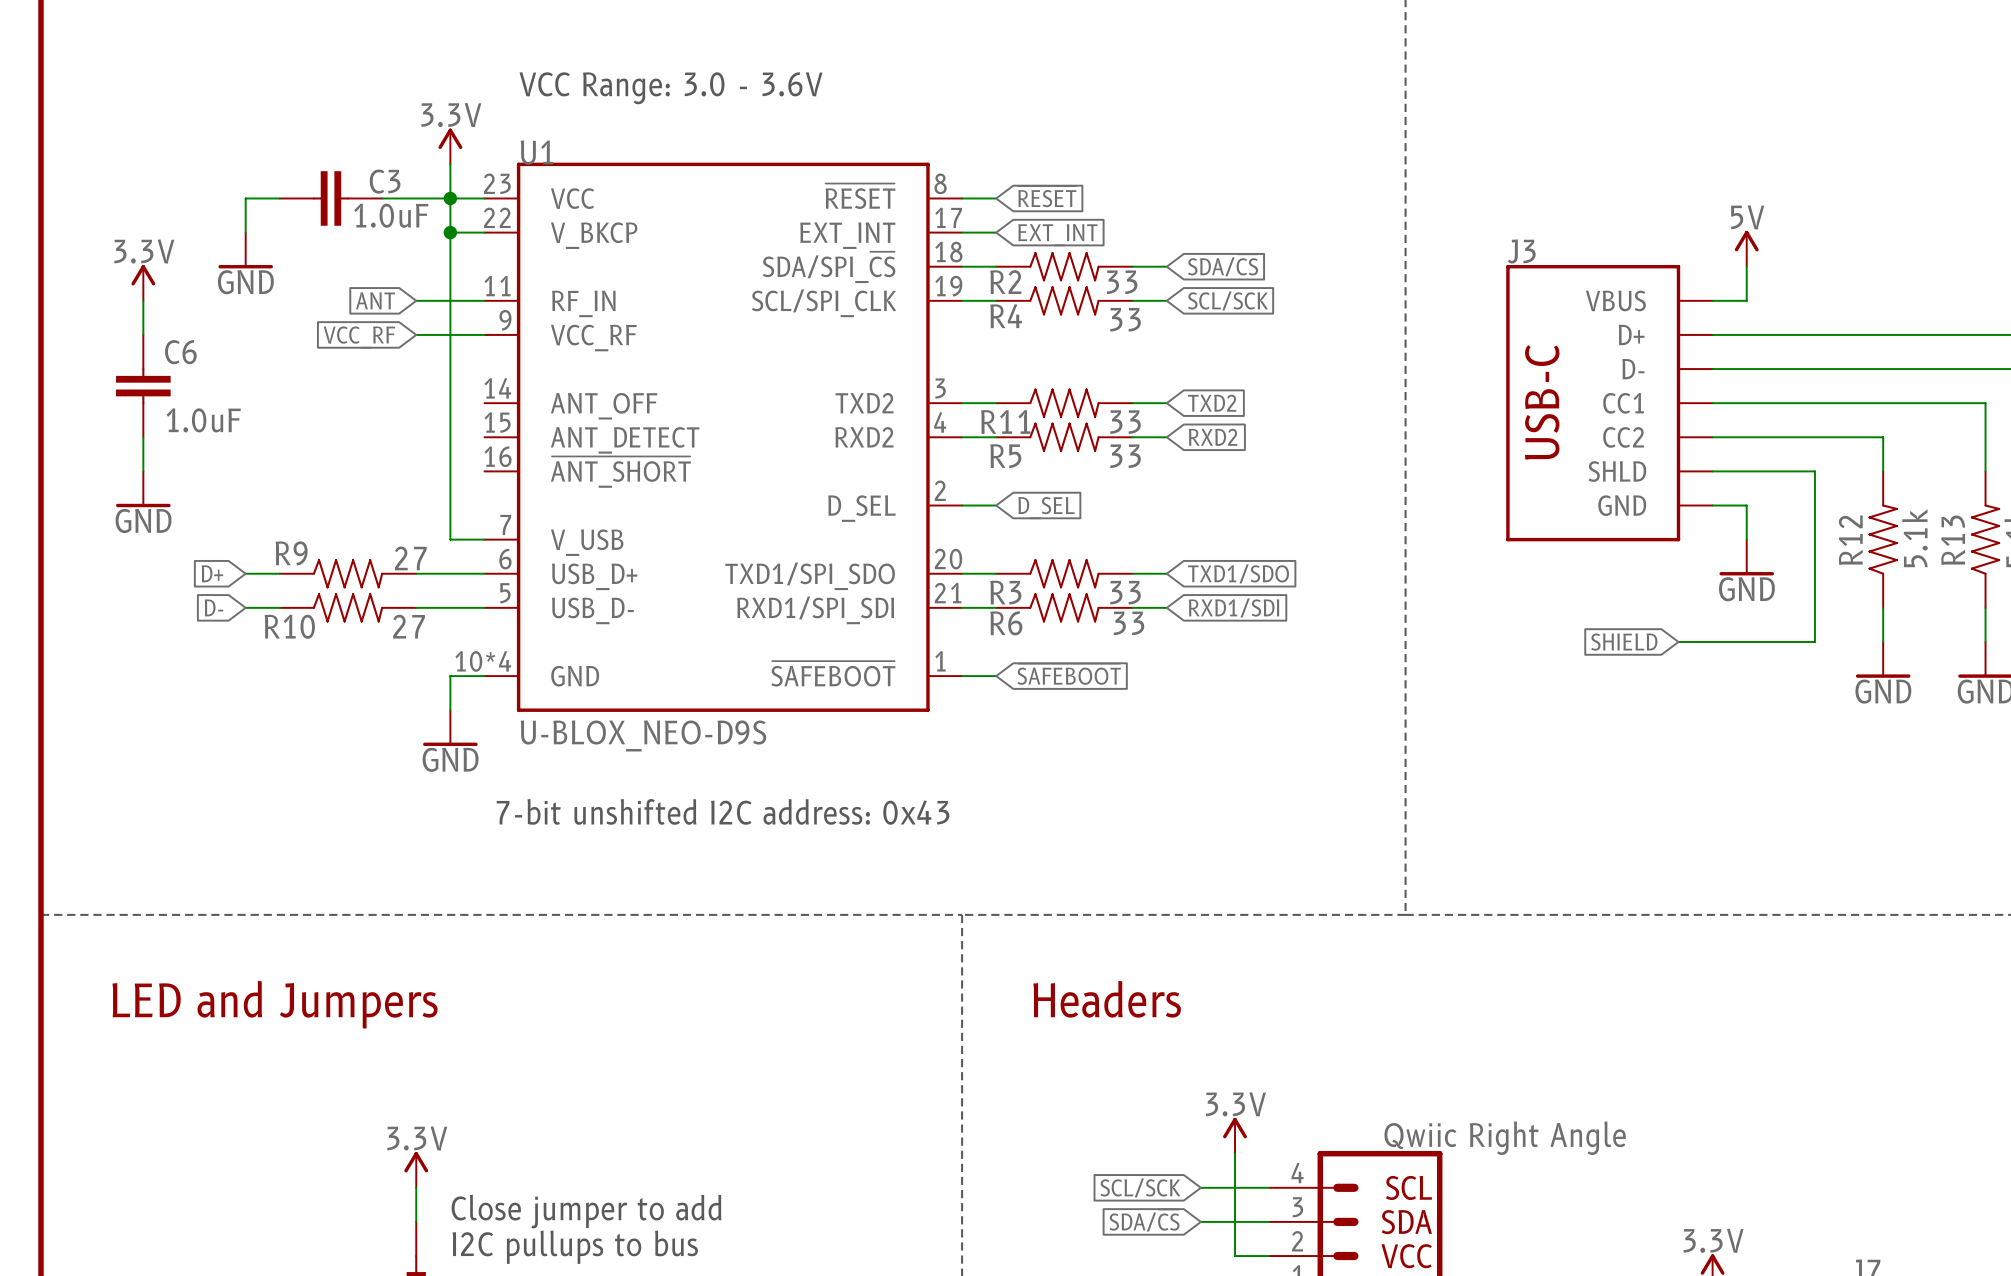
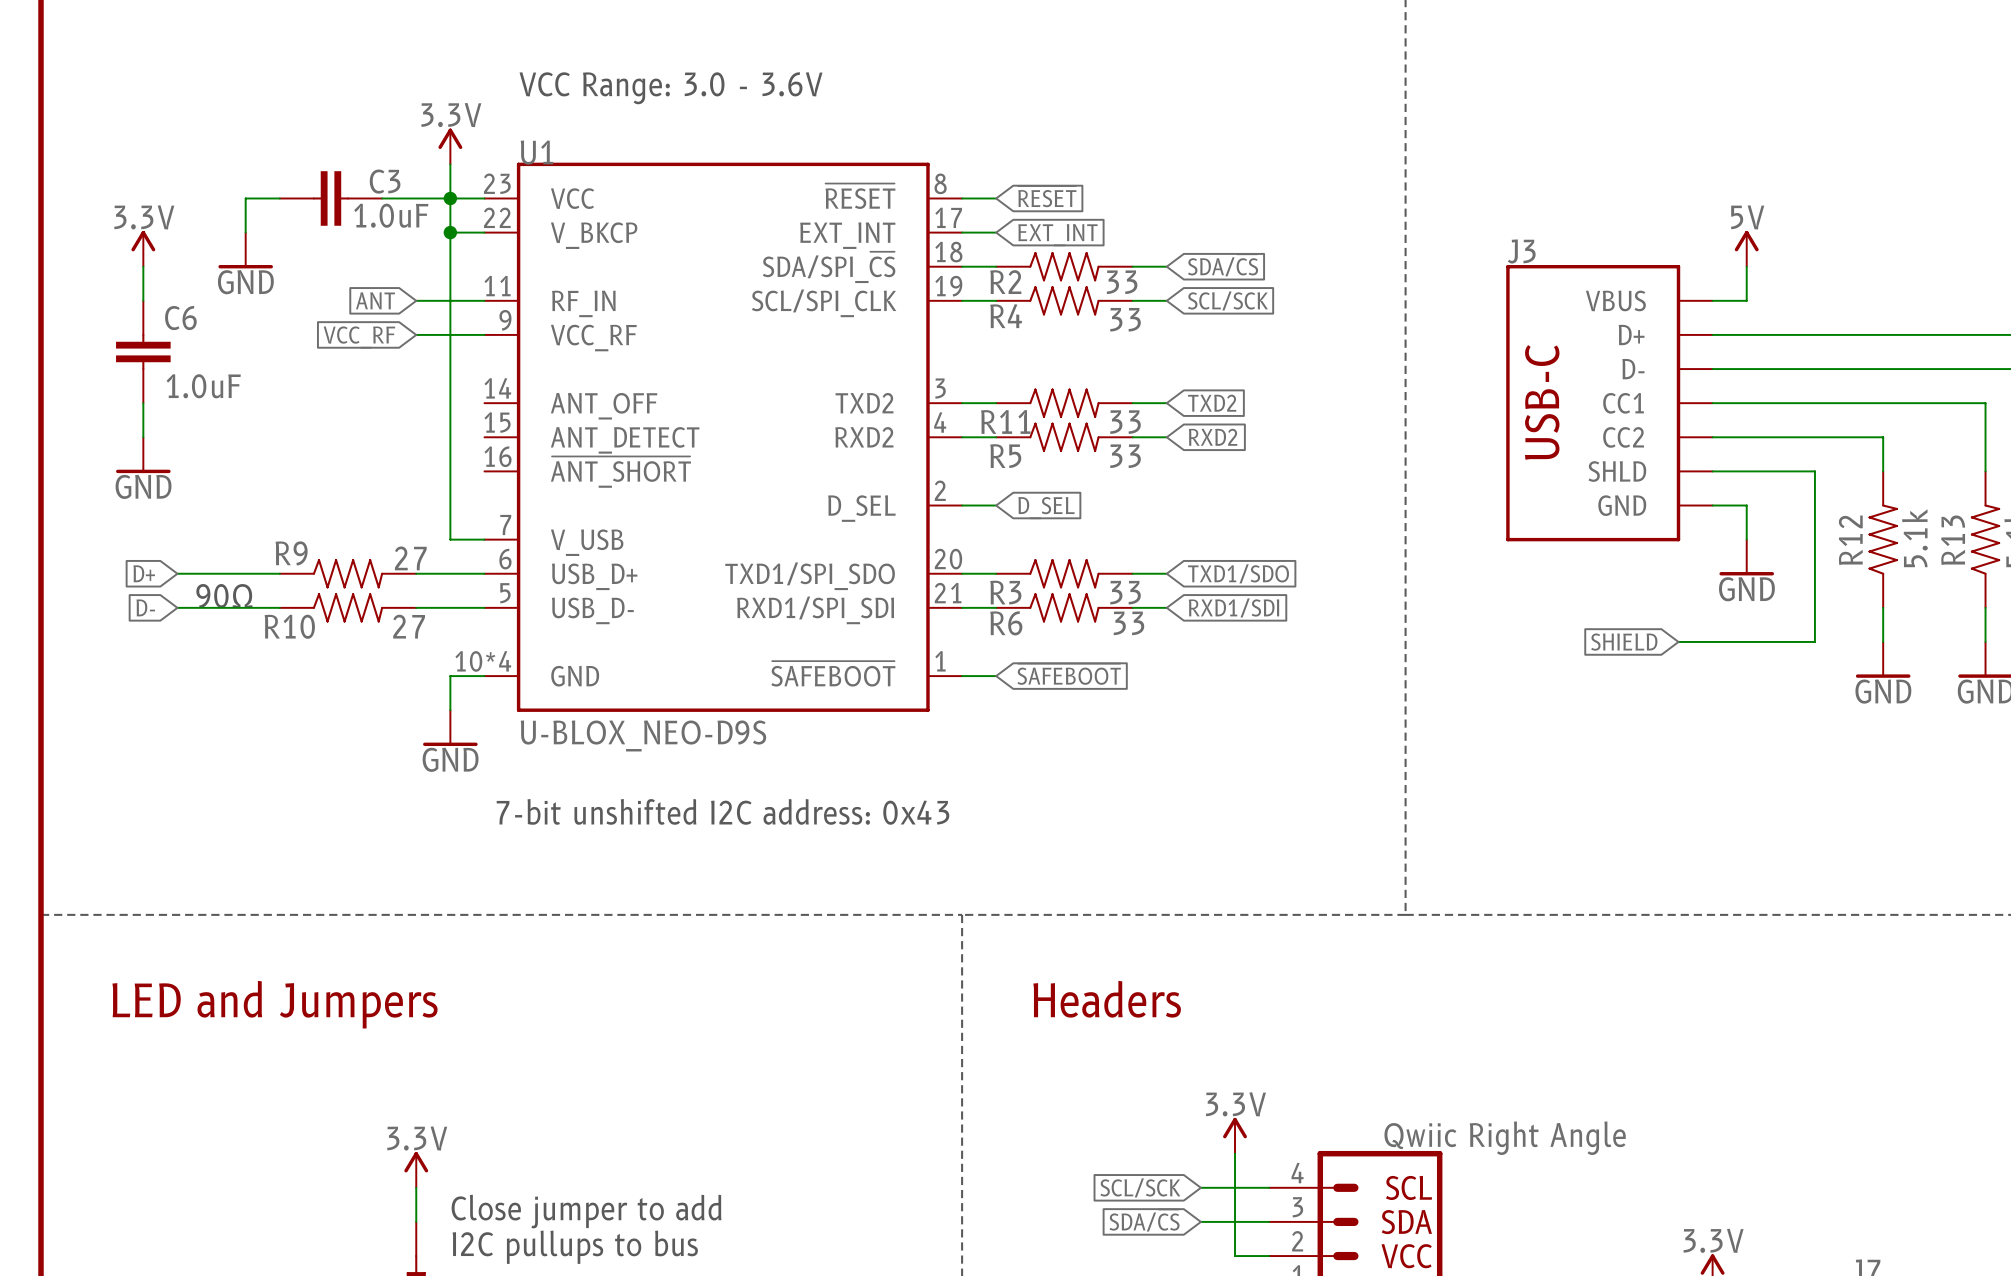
power symbol position: 3.3V (143, 282) -> 3.3V (143, 248)
C6 position: (143, 386) -> (143, 352)
power symbol position: GND (143, 489) -> GND (143, 455)
wire: none -> (177, 573) (245, 573)
global label position: D+ (212, 573) -> D+ (144, 573)
text: none -> 90Ω (224, 596)
wire: none -> (177, 607) (245, 607)
global label position: D- (213, 607) -> D- (145, 607)

